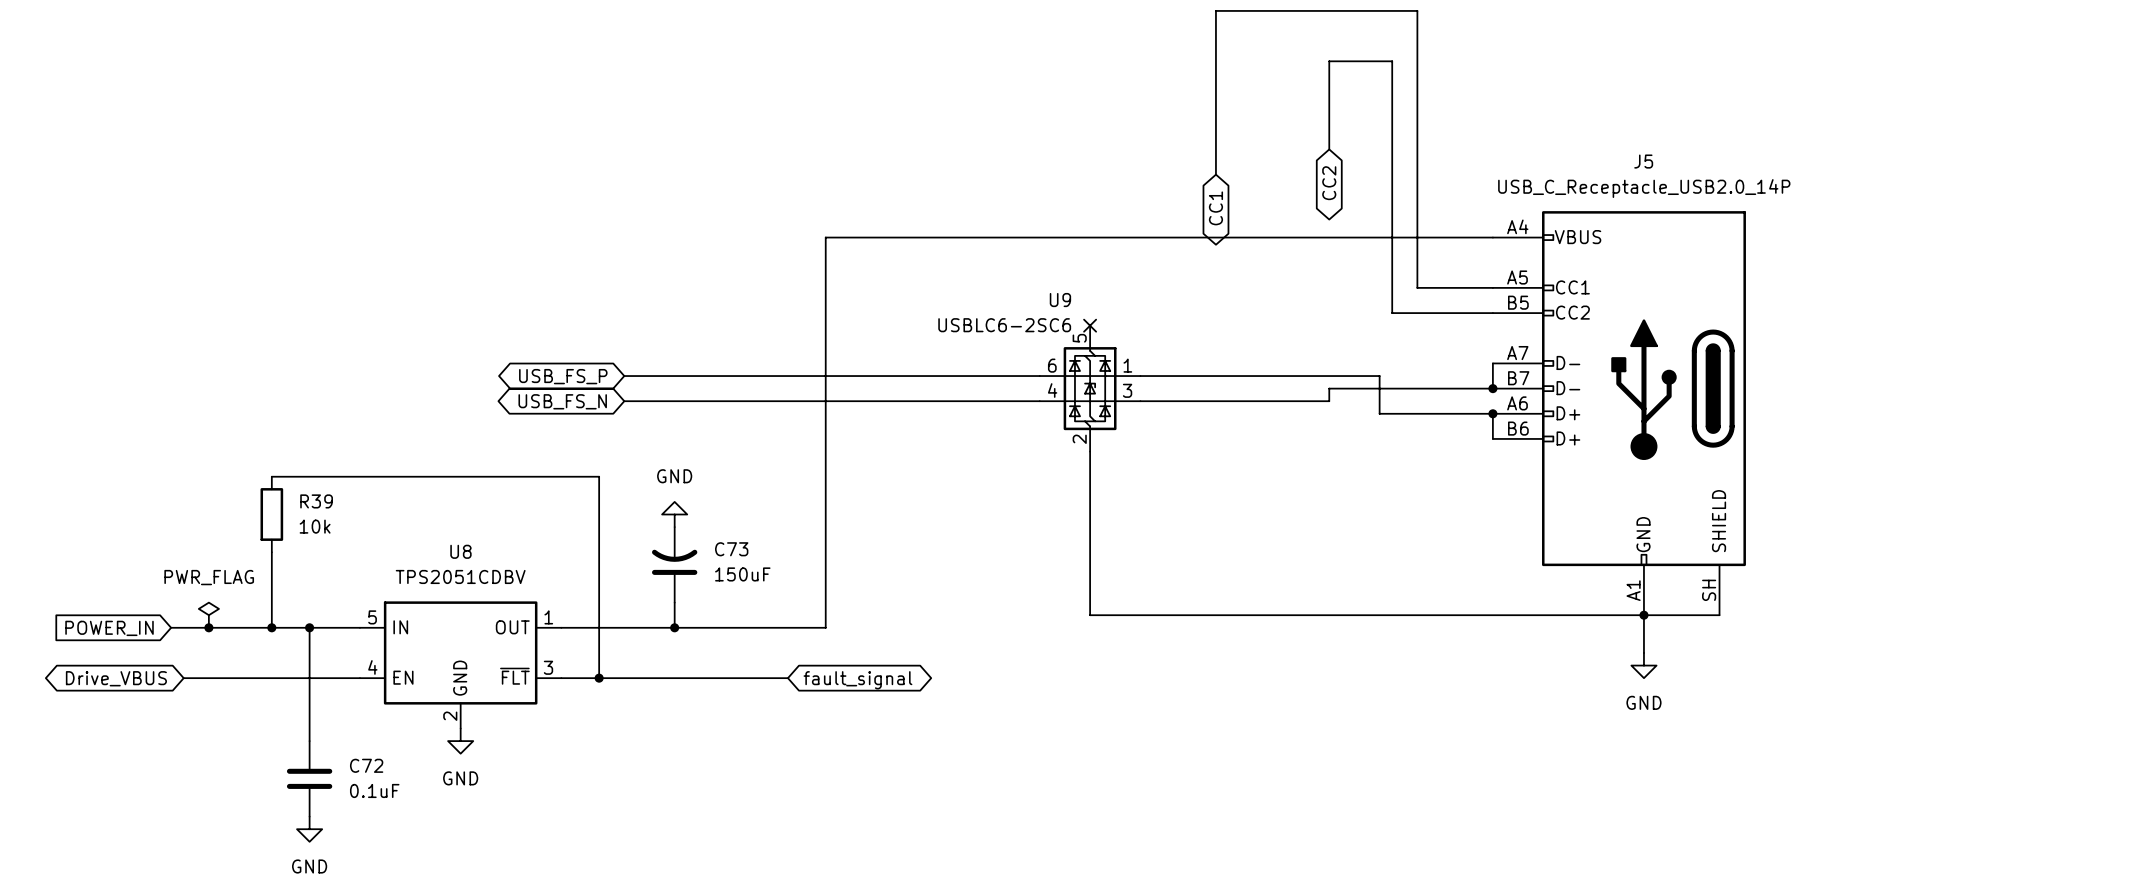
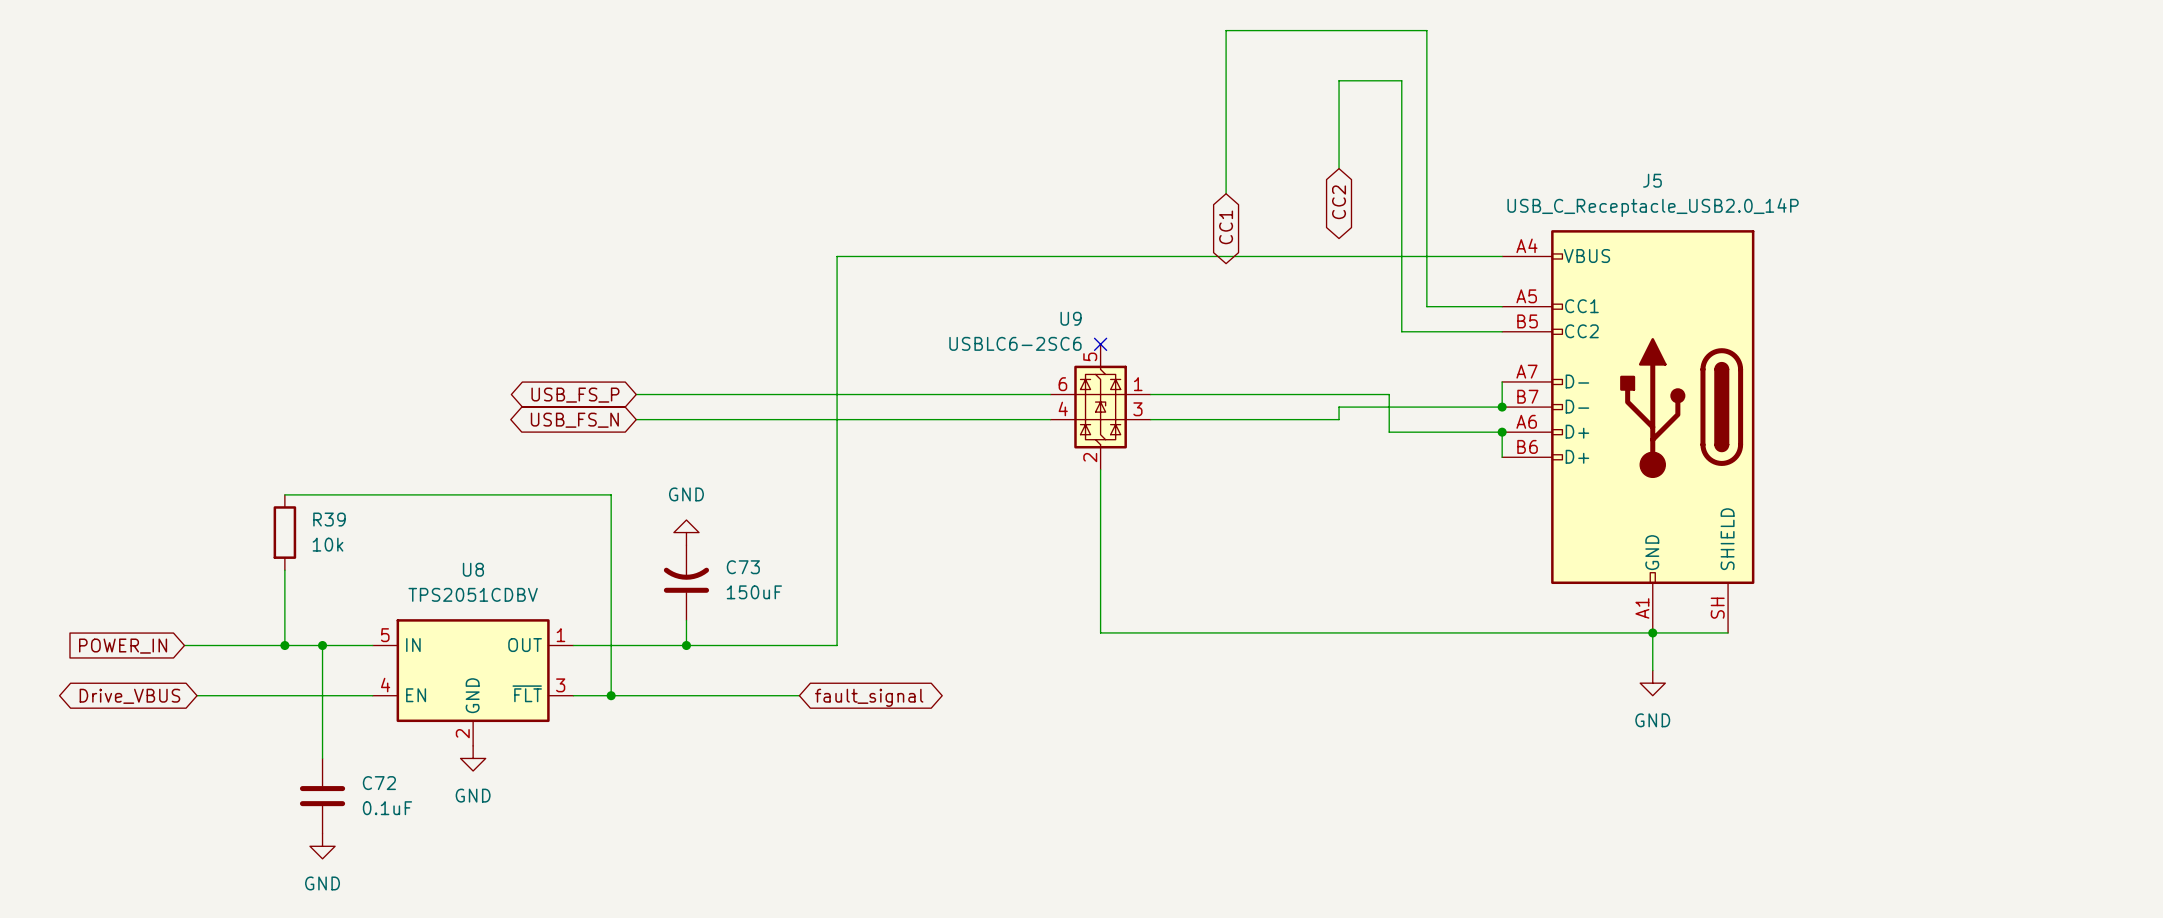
power symbol: PWR_FLAG (208, 615) -> none
junction: (208, 627) -> none

